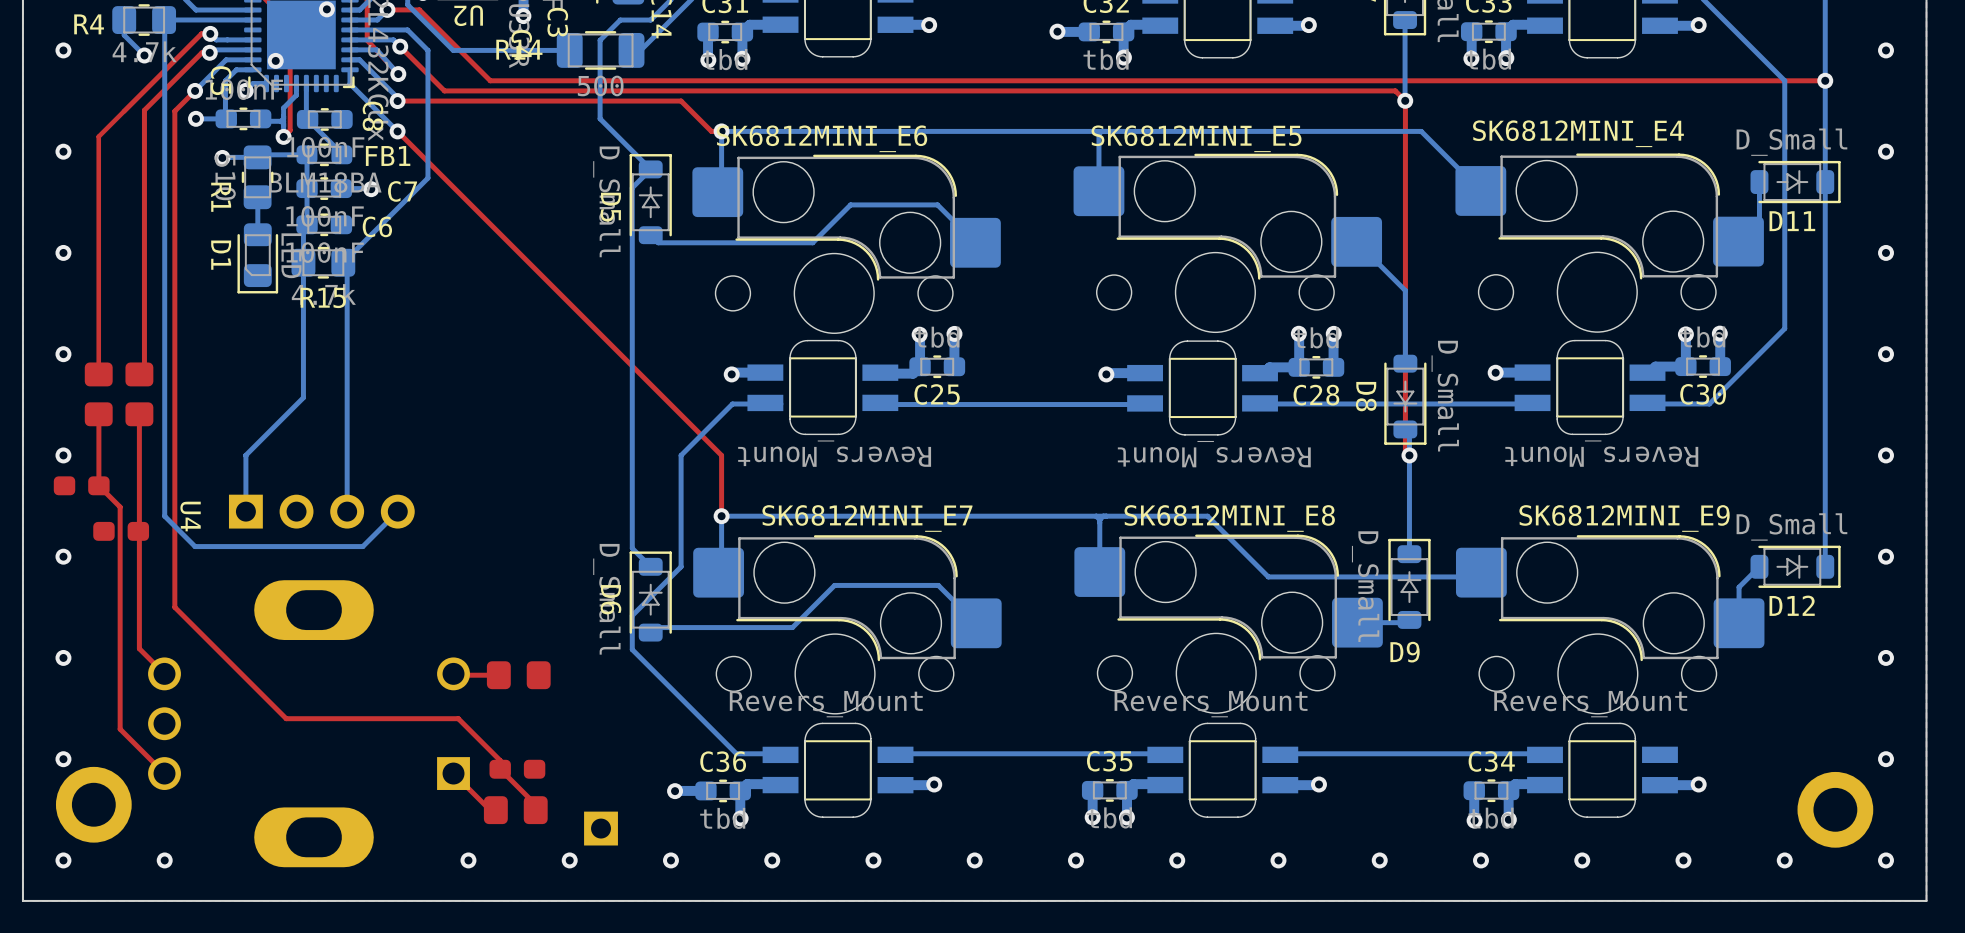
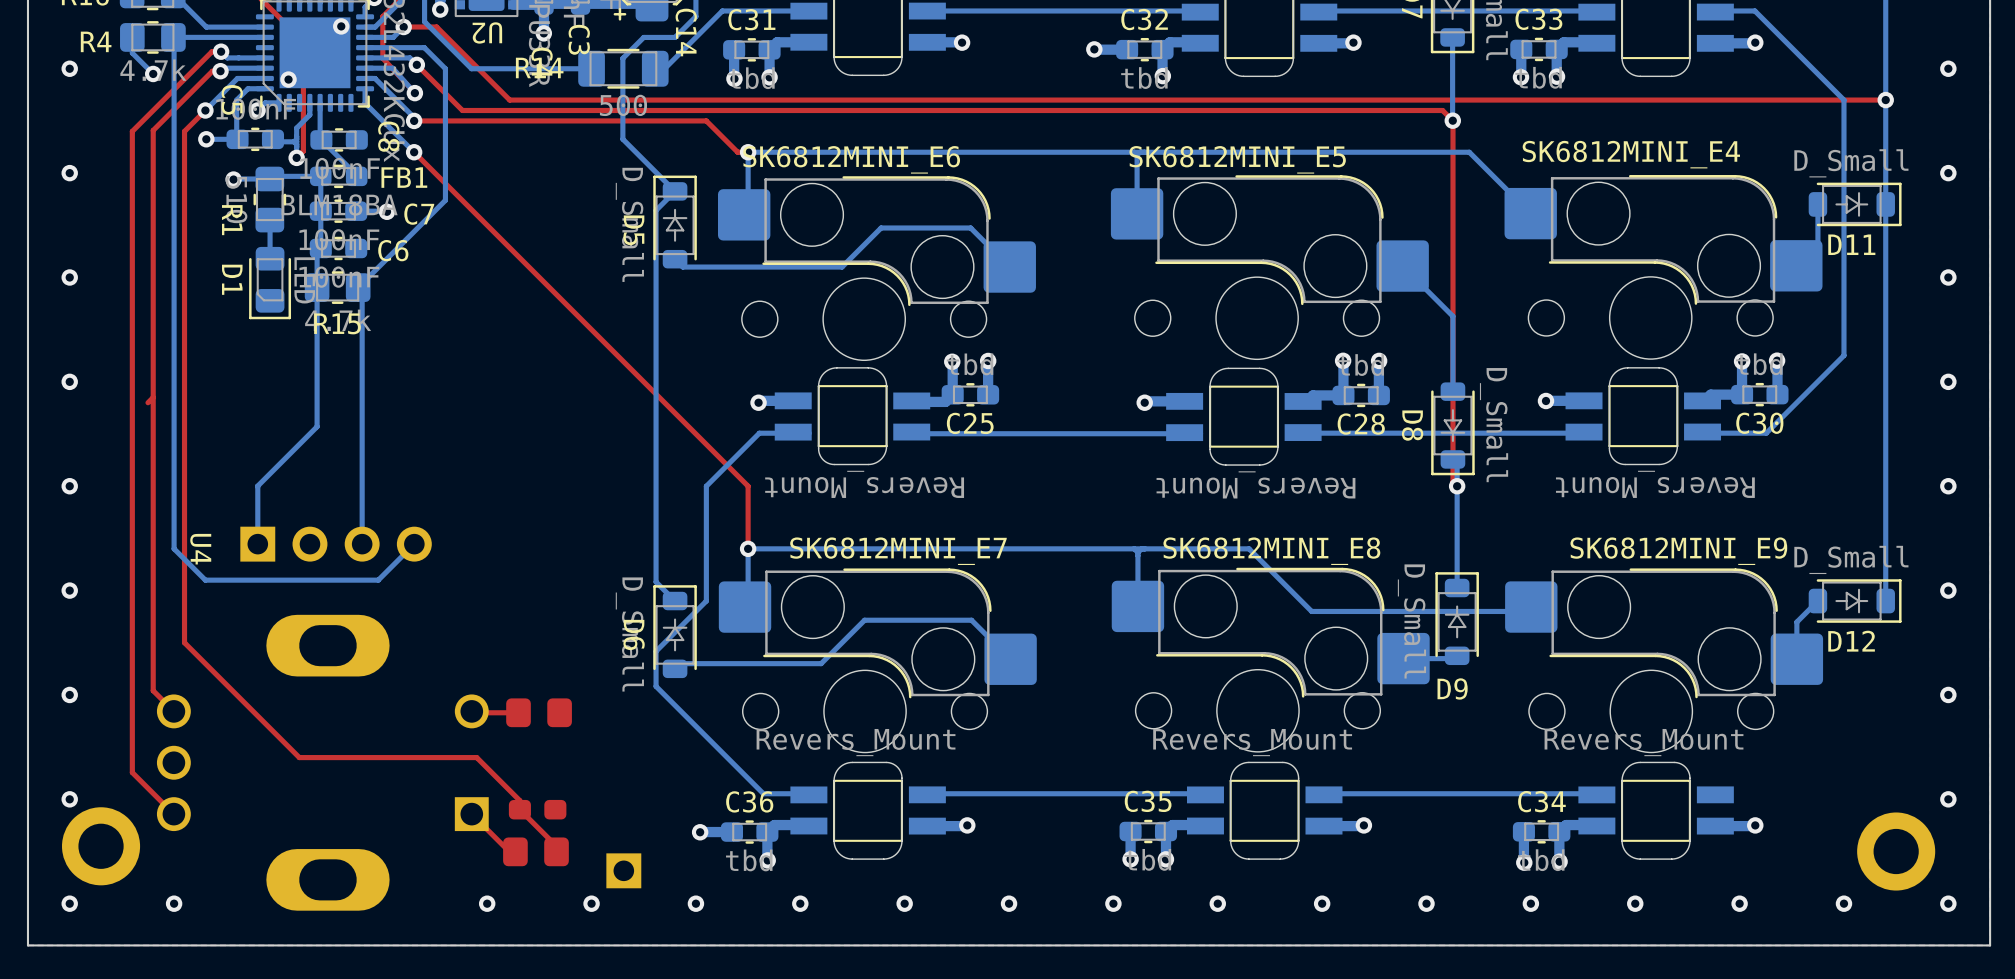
top track: (124, 111) (98, 136) (98, 374) -> none
part: (98, 394) -> none
part: (139, 394) -> none
top track: (98, 414) (98, 485) (120, 507) (120, 729) (124, 733) -> (132, 131) (132, 772)
top track: (139, 414) (139, 648) (144, 653) -> (153, 397) (153, 690)
part: (81, 485) -> none
part: (121, 531) -> none

